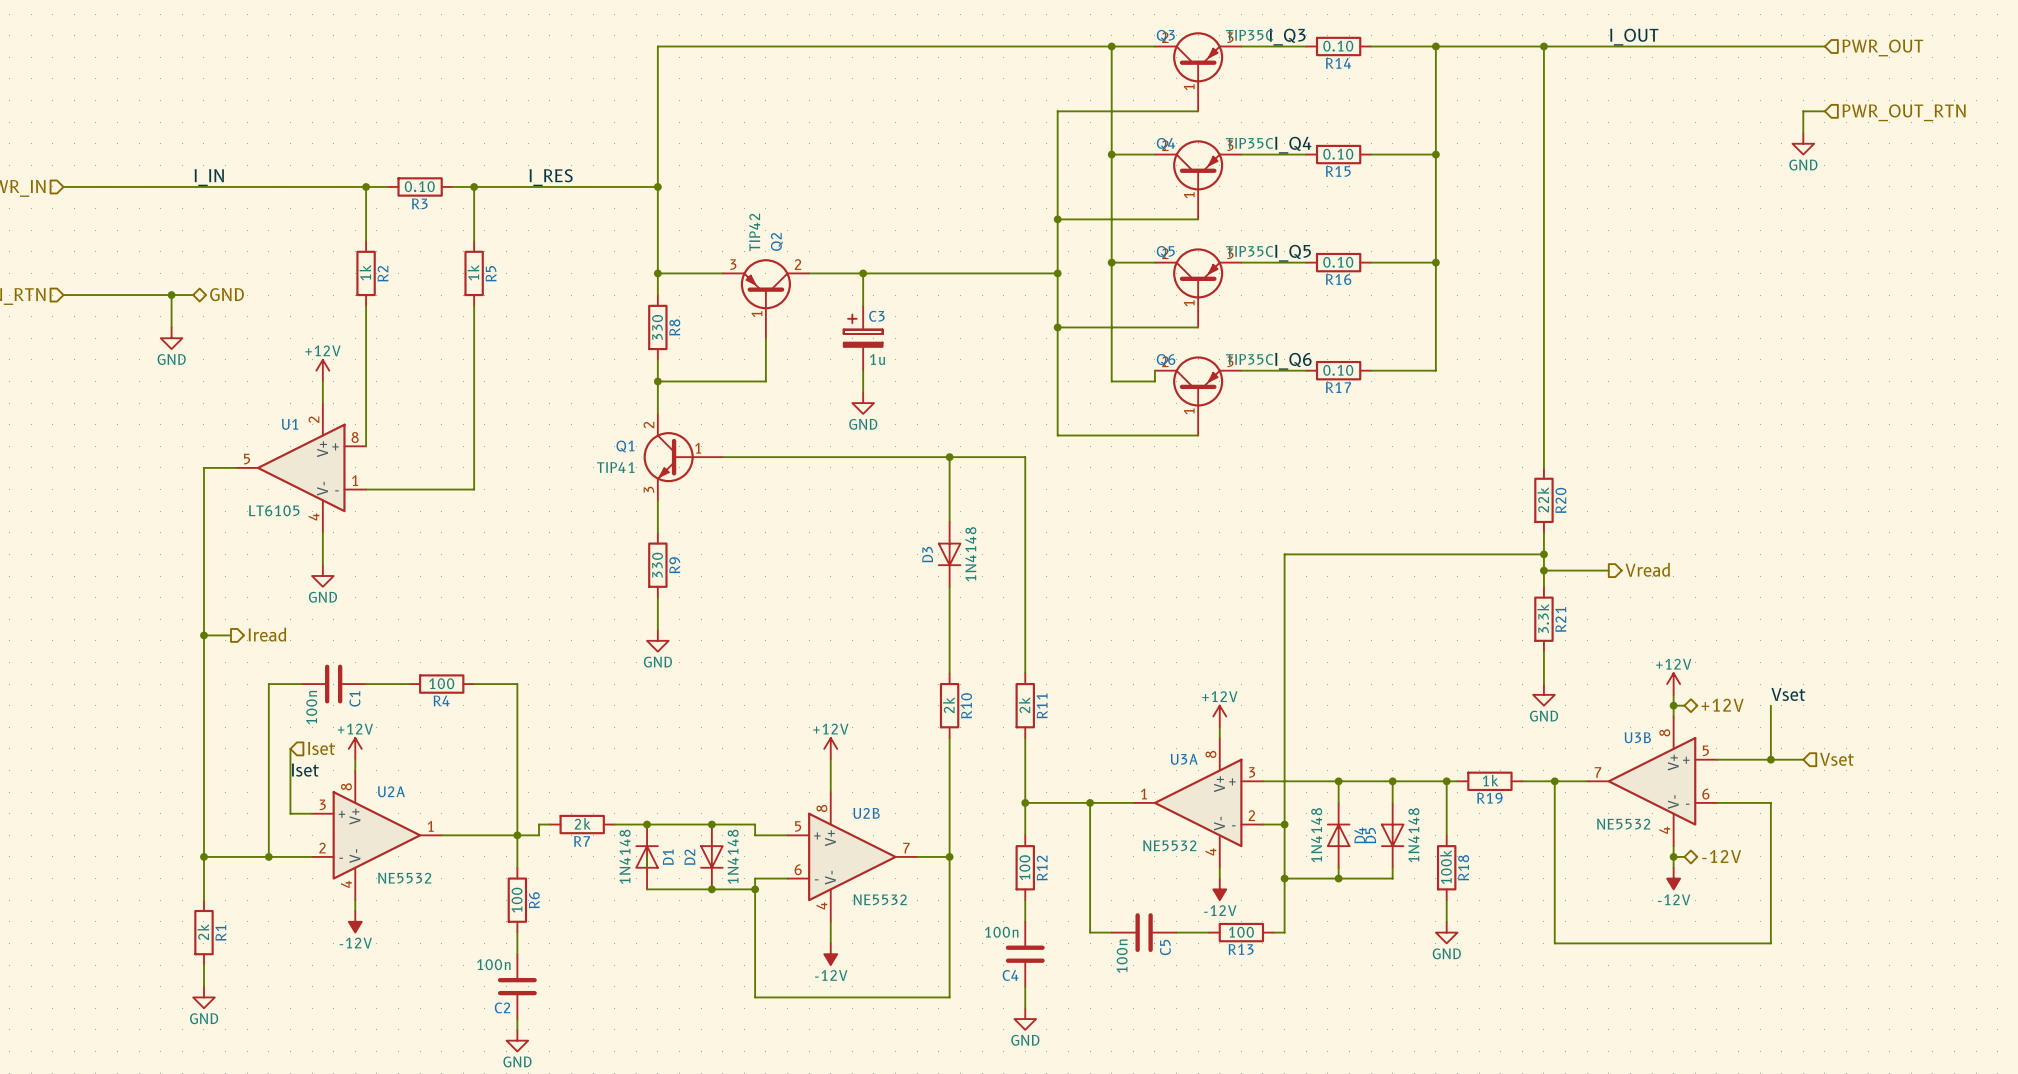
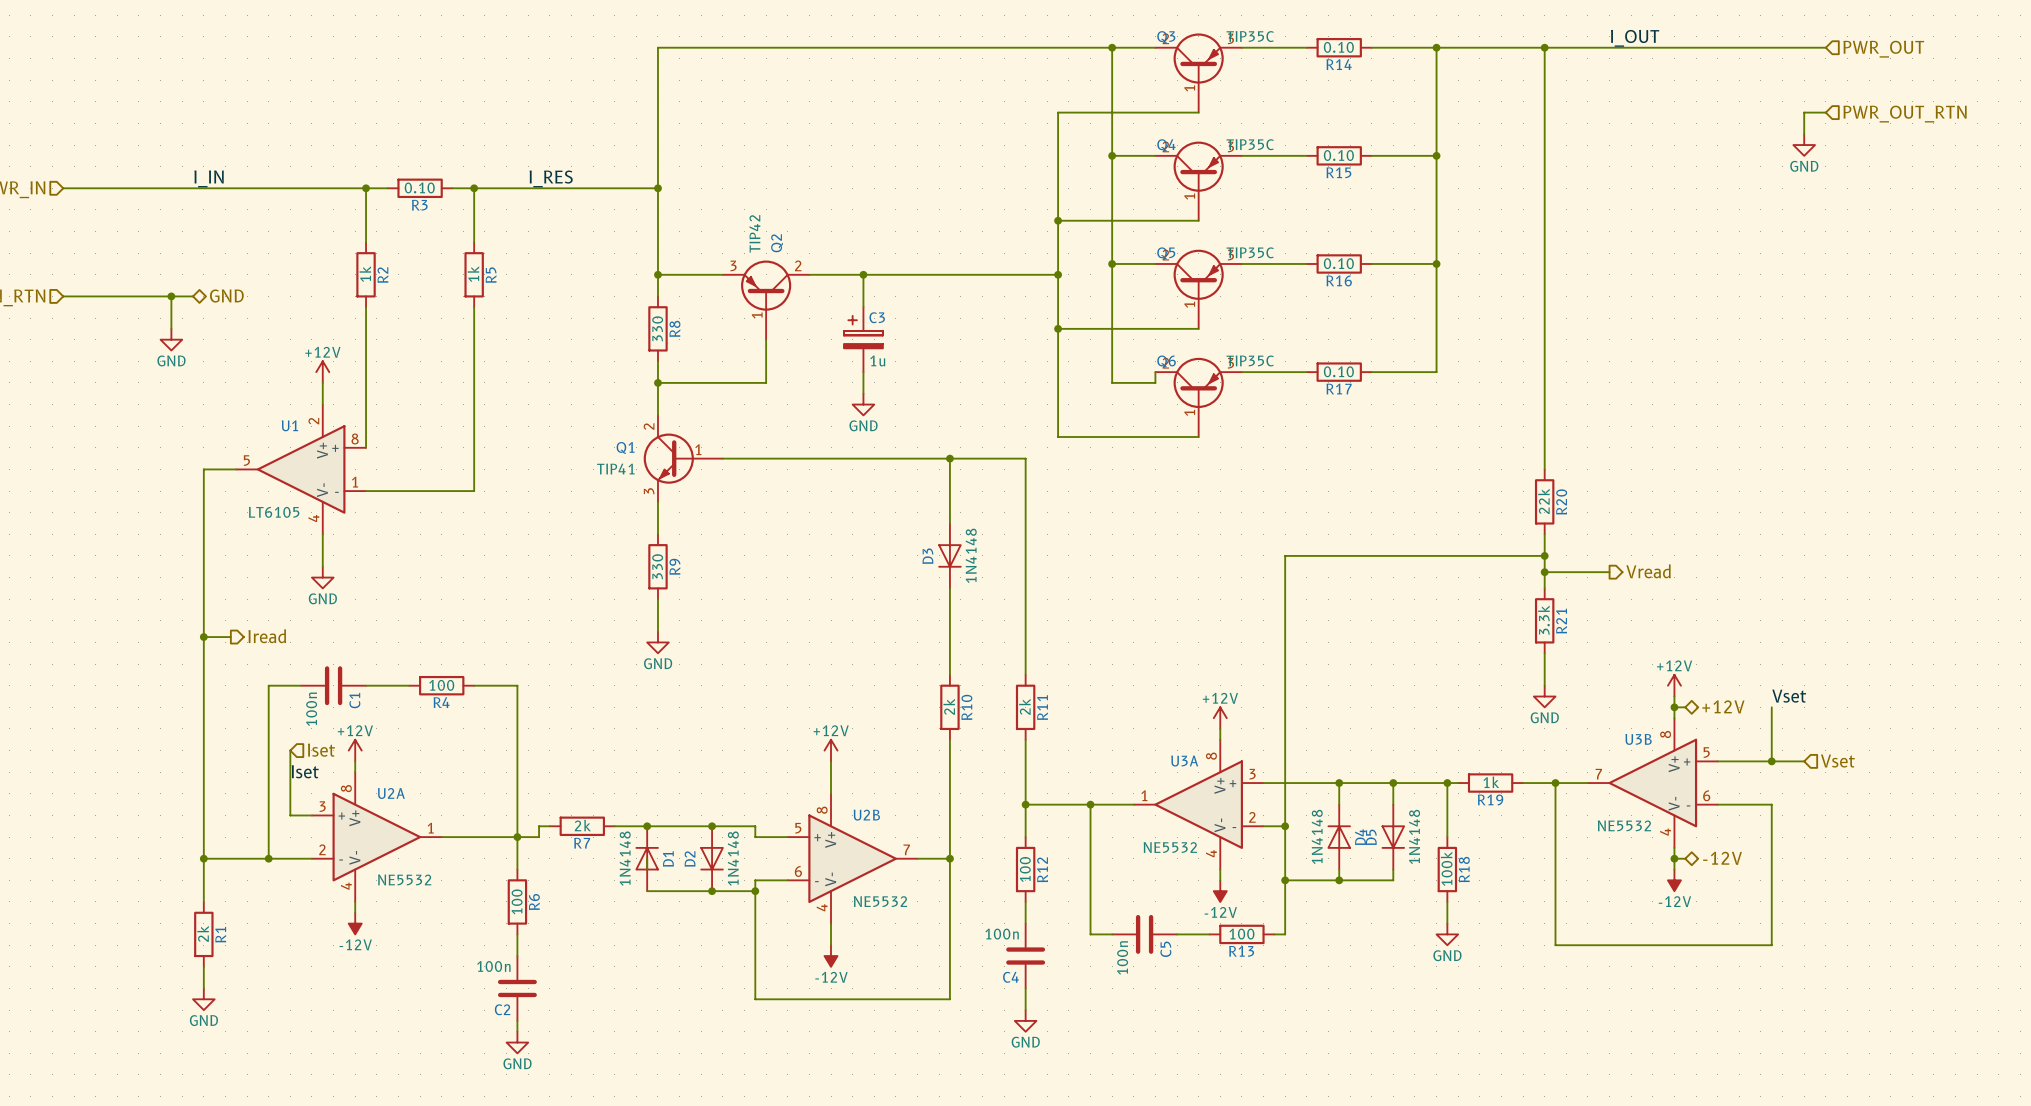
label: I_Q3 (1287, 37) -> none
label: I_Q4 (1293, 145) -> none
label: I_Q5 (1293, 253) -> none
label: I_Q6 (1293, 361) -> none

